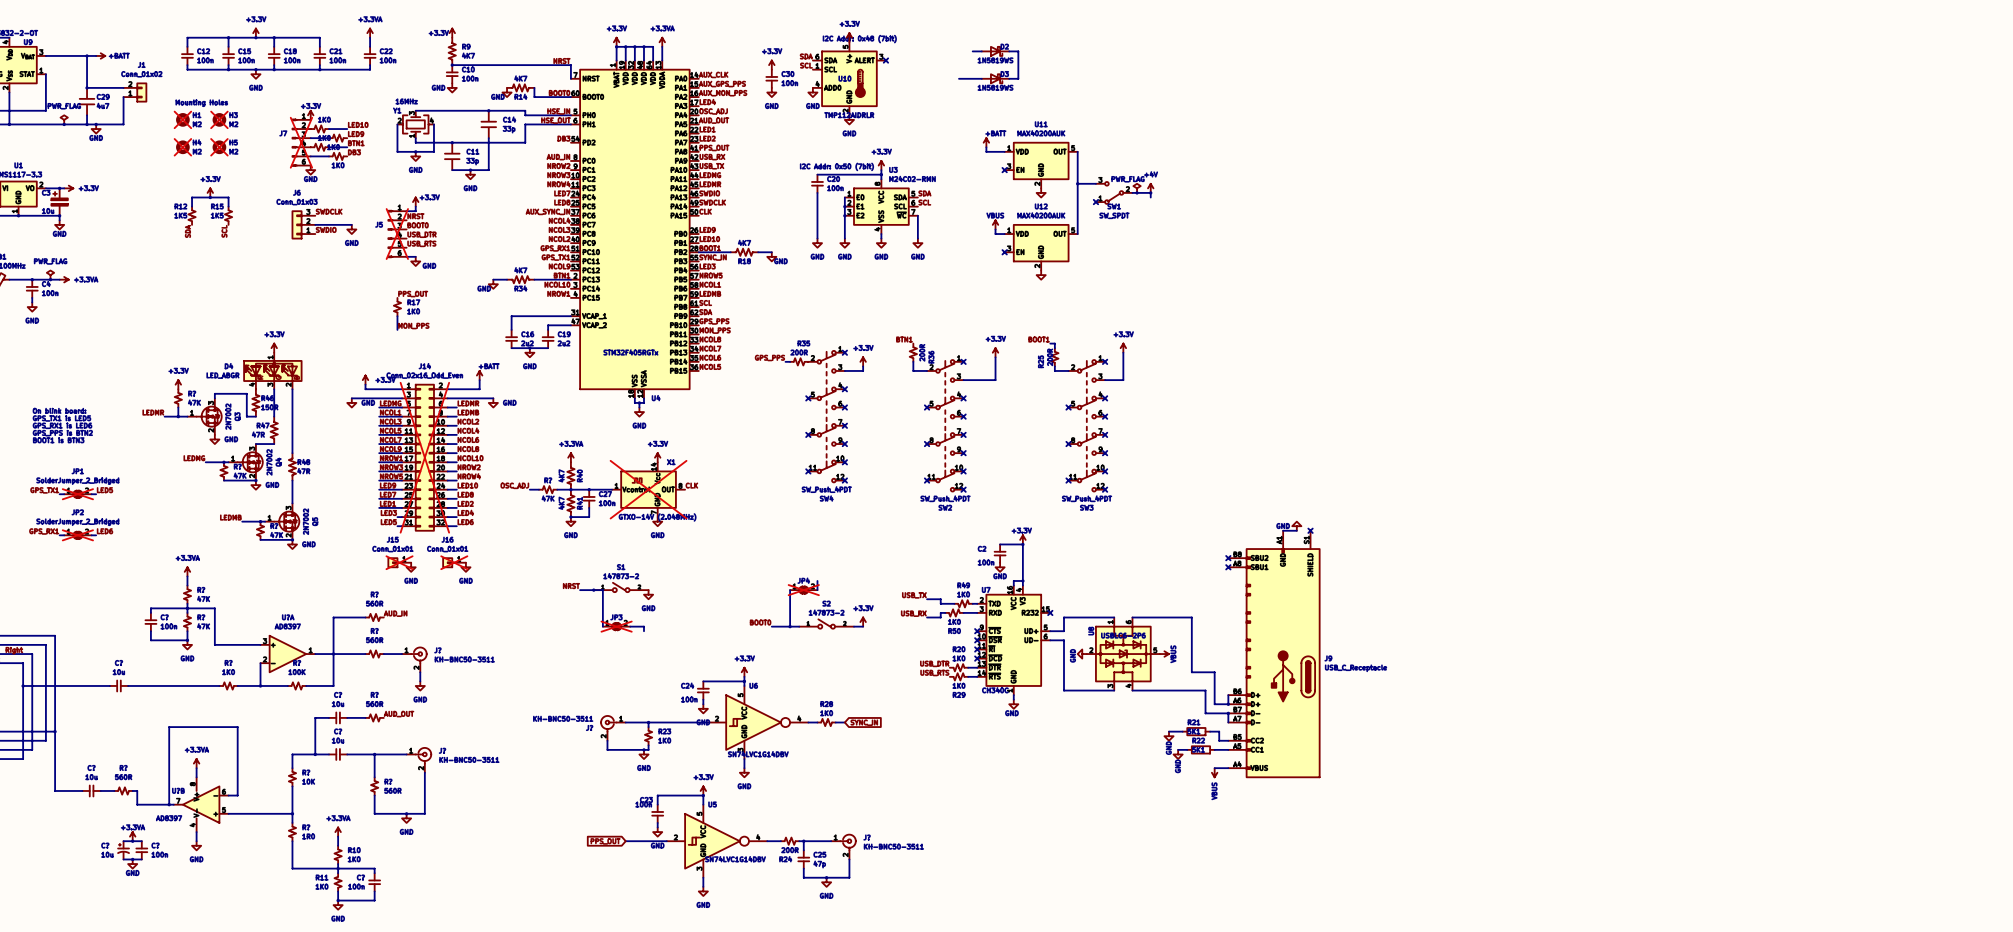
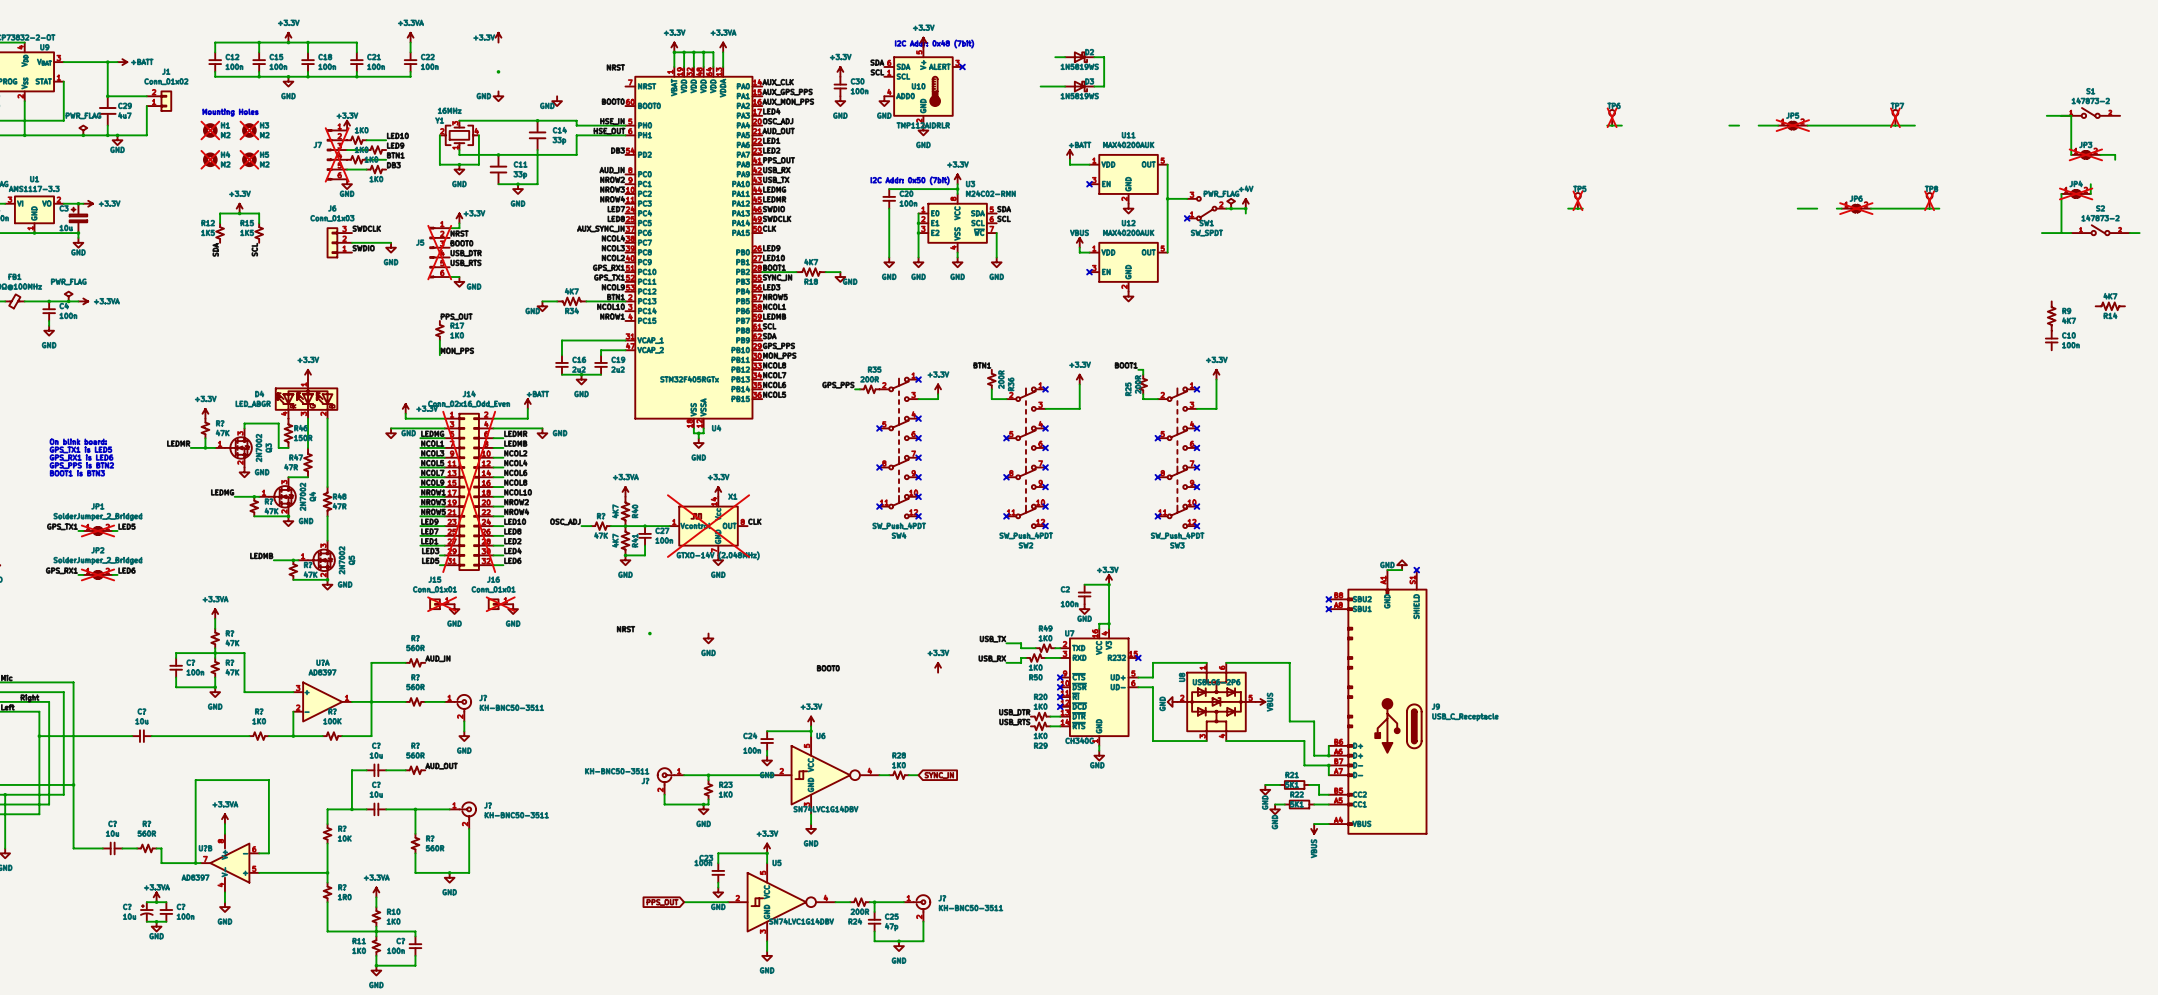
part position: (452, 51) -> (2051, 316)
wire: (452, 65) (570, 65) (570, 78) -> none
part position: (452, 74) -> (2051, 340)
part position: (520, 87) -> (2110, 306)
wire: (534, 87) (534, 97) (570, 97) -> none
wire: none -> (2046, 115) (2071, 115) (2071, 154)
part: none -> (1612, 117)
part: none -> (1895, 117)
wire: none -> (1607, 125) (1621, 125)
wire: none -> (1729, 125) (1739, 125)
wire: none -> (1758, 125) (1778, 125)
part: none -> (1792, 125)
wire: none -> (1807, 125) (1914, 125)
wire: none -> (2100, 154) (2115, 154) (2115, 159)
wire: none -> (2090, 184) (2090, 193)
wire: none -> (2061, 193) (2061, 233)
part: none -> (1577, 200)
part: none -> (1929, 200)
wire: none -> (1568, 208) (1582, 208)
wire: none -> (1797, 208) (1817, 208)
wire: none -> (1836, 208) (1841, 208)
part: none -> (1856, 208)
wire: none -> (1870, 208) (1939, 208)
wire: none -> (2041, 233) (2071, 233)
wire: none -> (2129, 233) (2139, 233)
wire: (817, 580) (817, 590) -> none
part position: (621, 587) -> (2090, 113)
wire: (580, 590) (602, 590) (602, 626) -> none
wire: (790, 590) (790, 626) -> none
part position: (803, 590) -> (2076, 193)
part position: (826, 624) -> (2100, 230)
part position: (616, 626) -> (2085, 154)
wire: (630, 626) (643, 626) (643, 631) -> none
wire: (771, 626) (799, 626) -> none
wire: (853, 626) (863, 626) -> none

